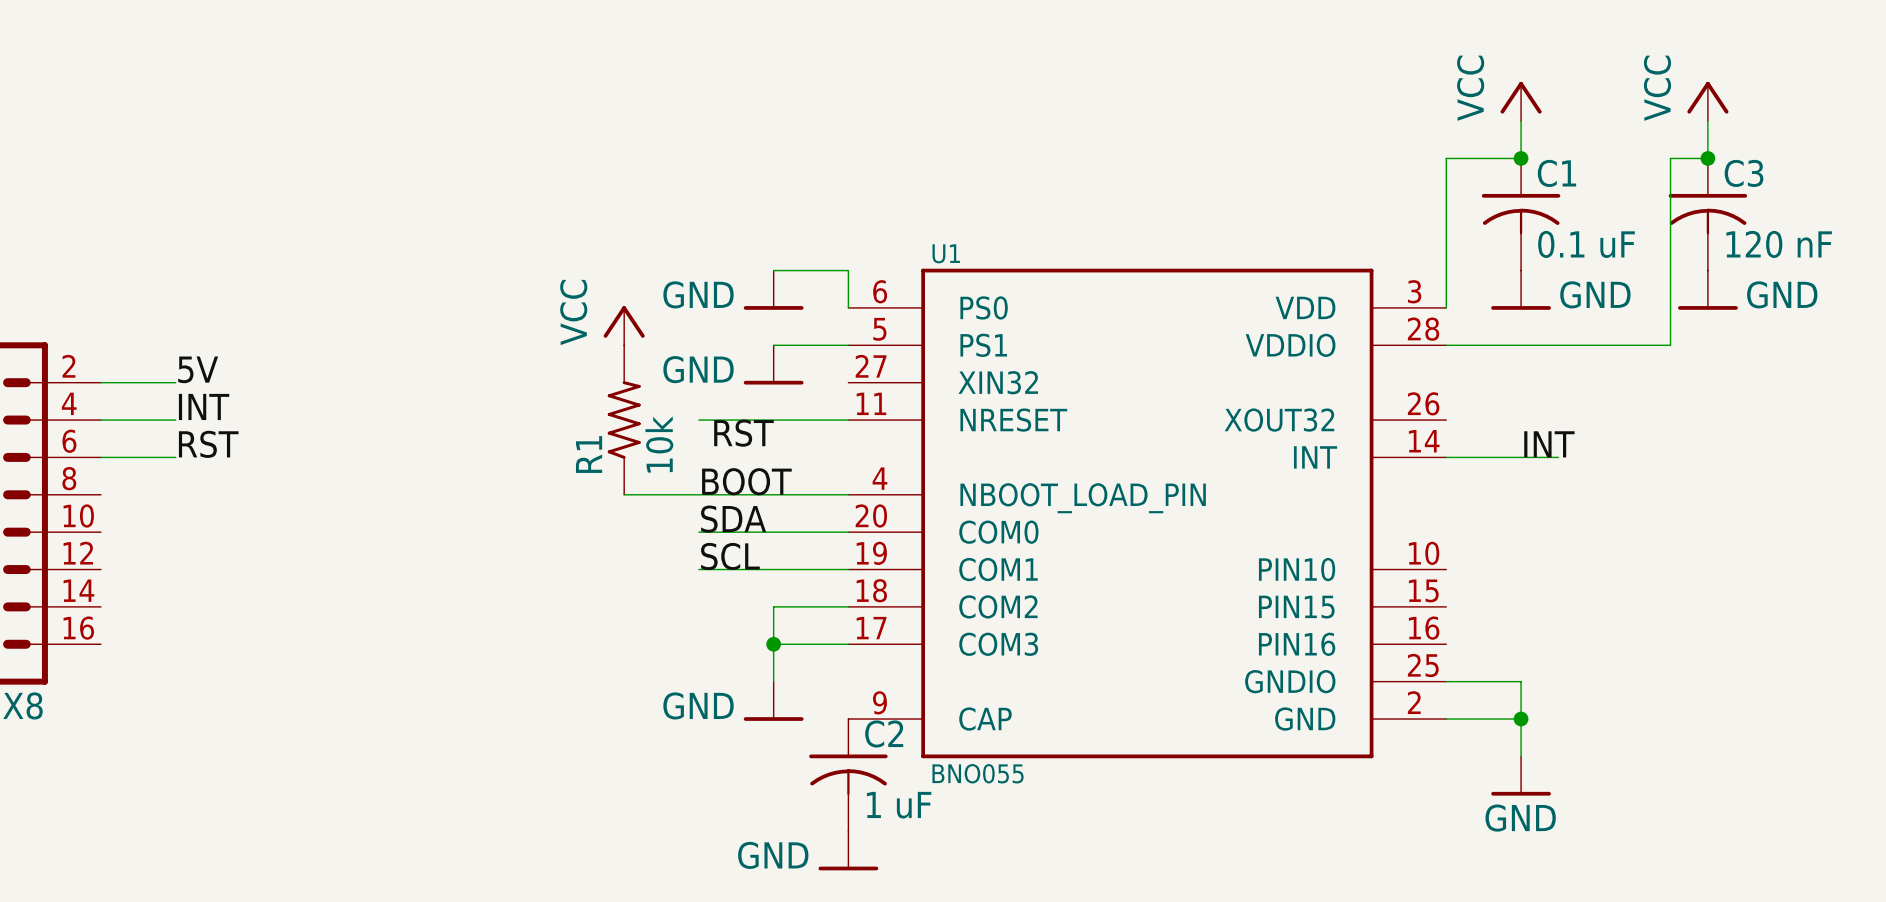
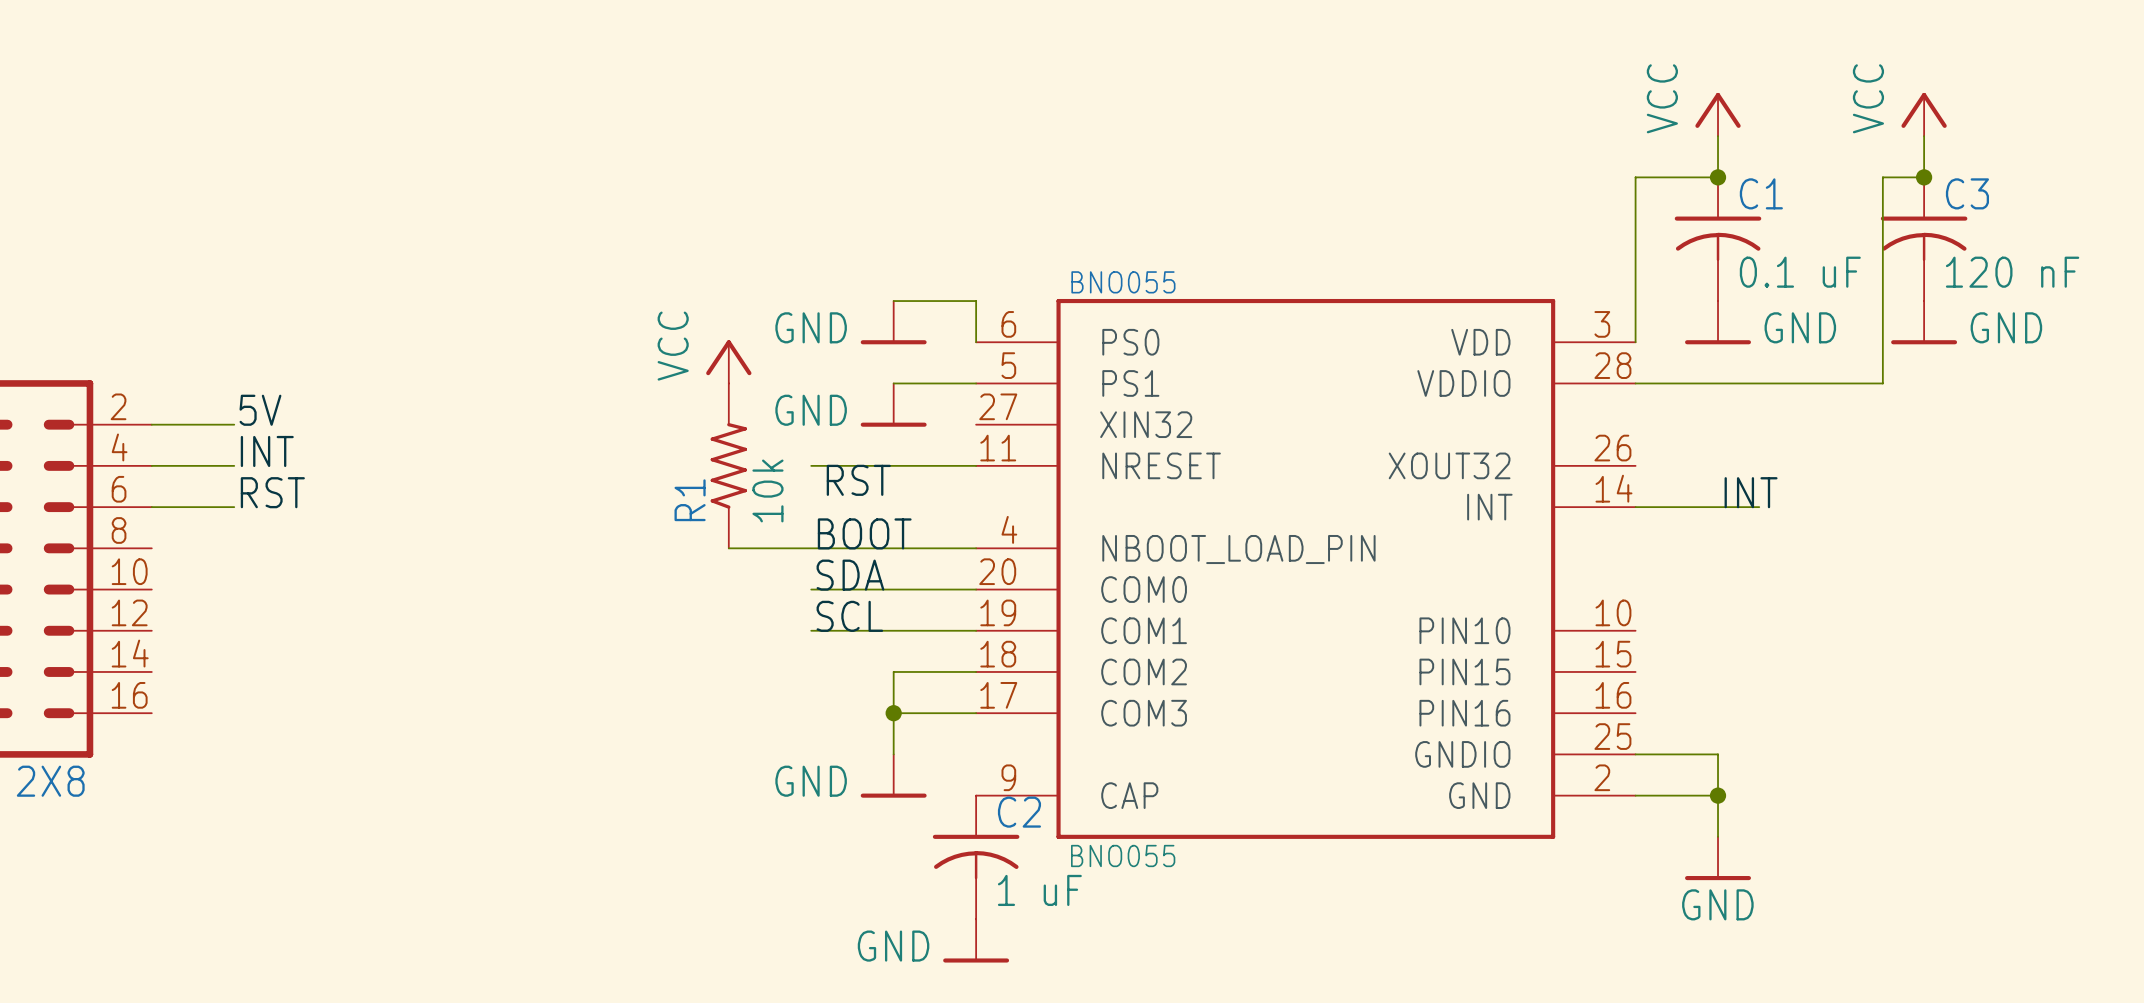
U1 name: U1 (946, 253) -> BNO055 (1123, 282)

